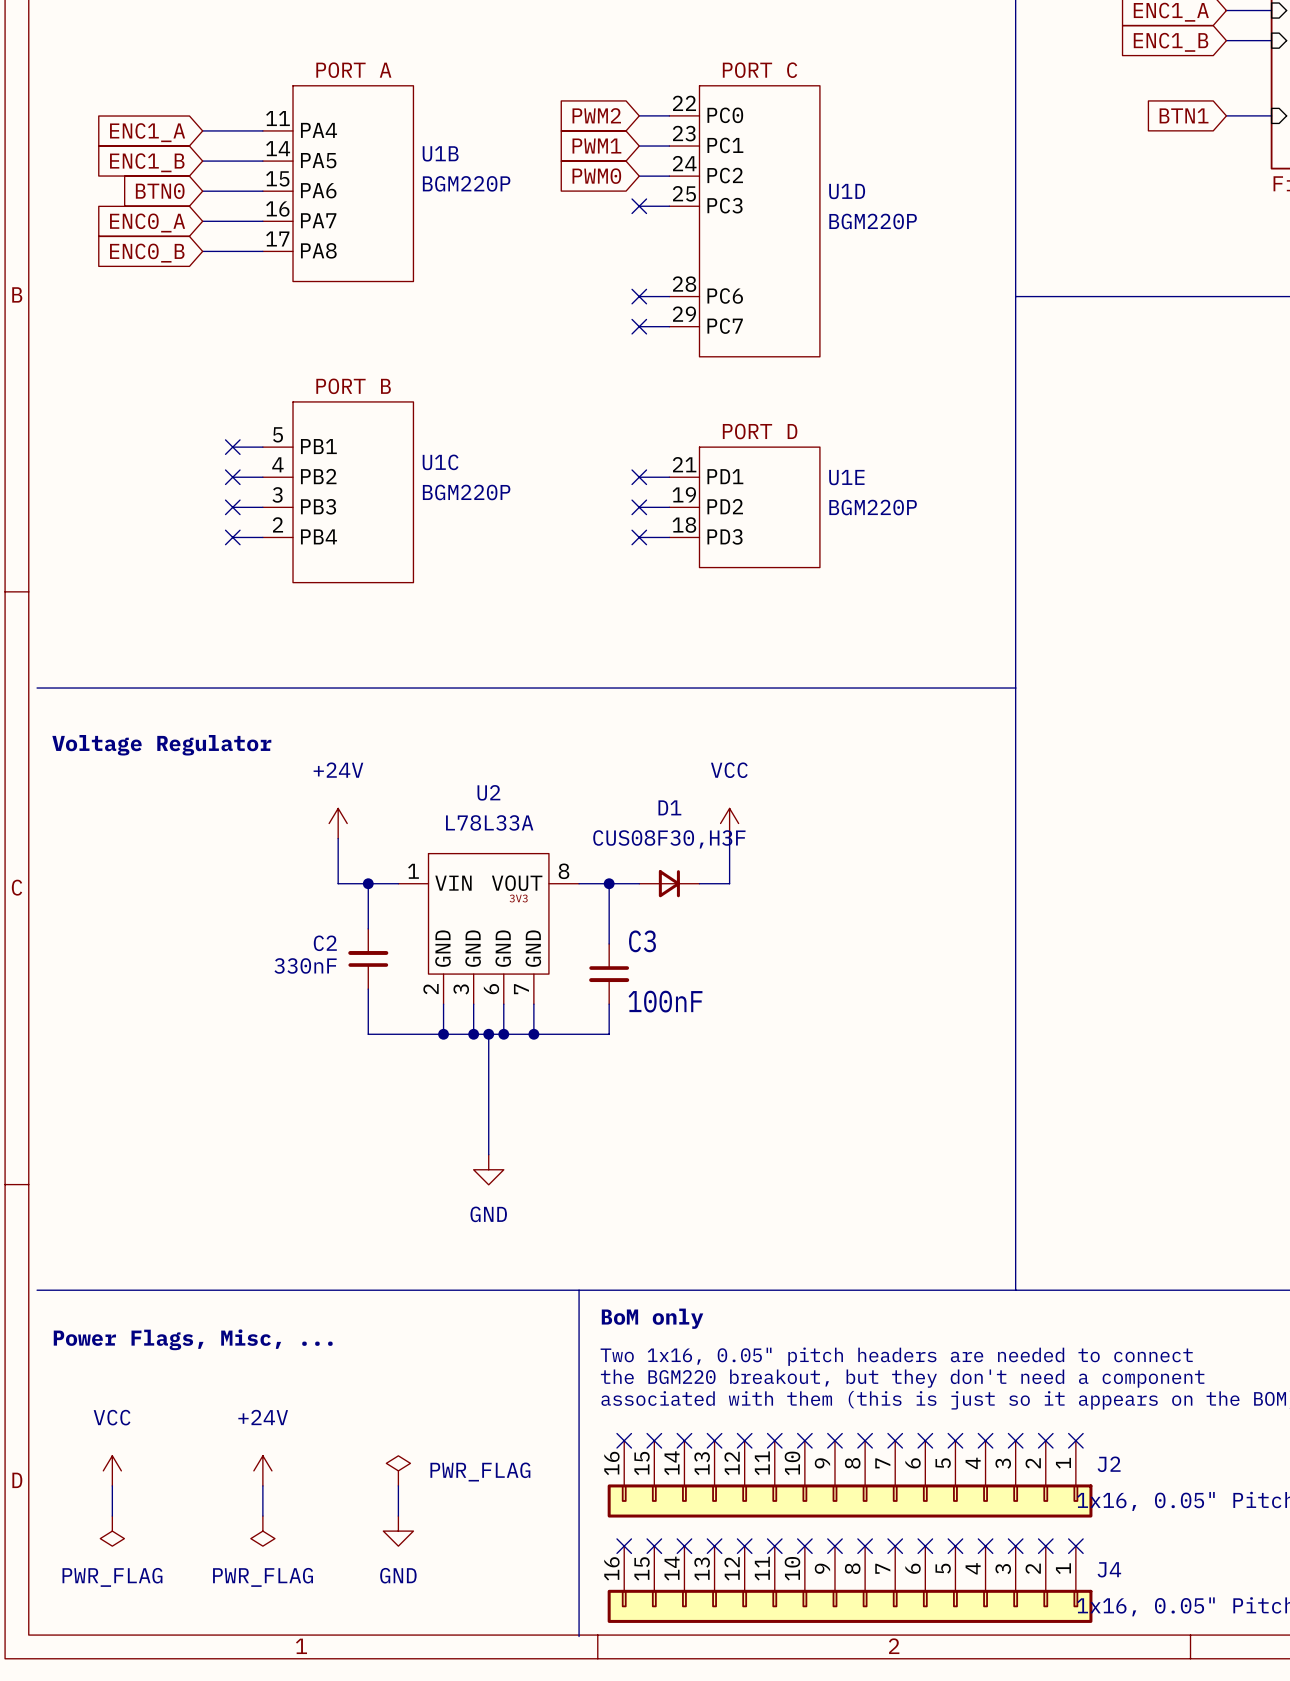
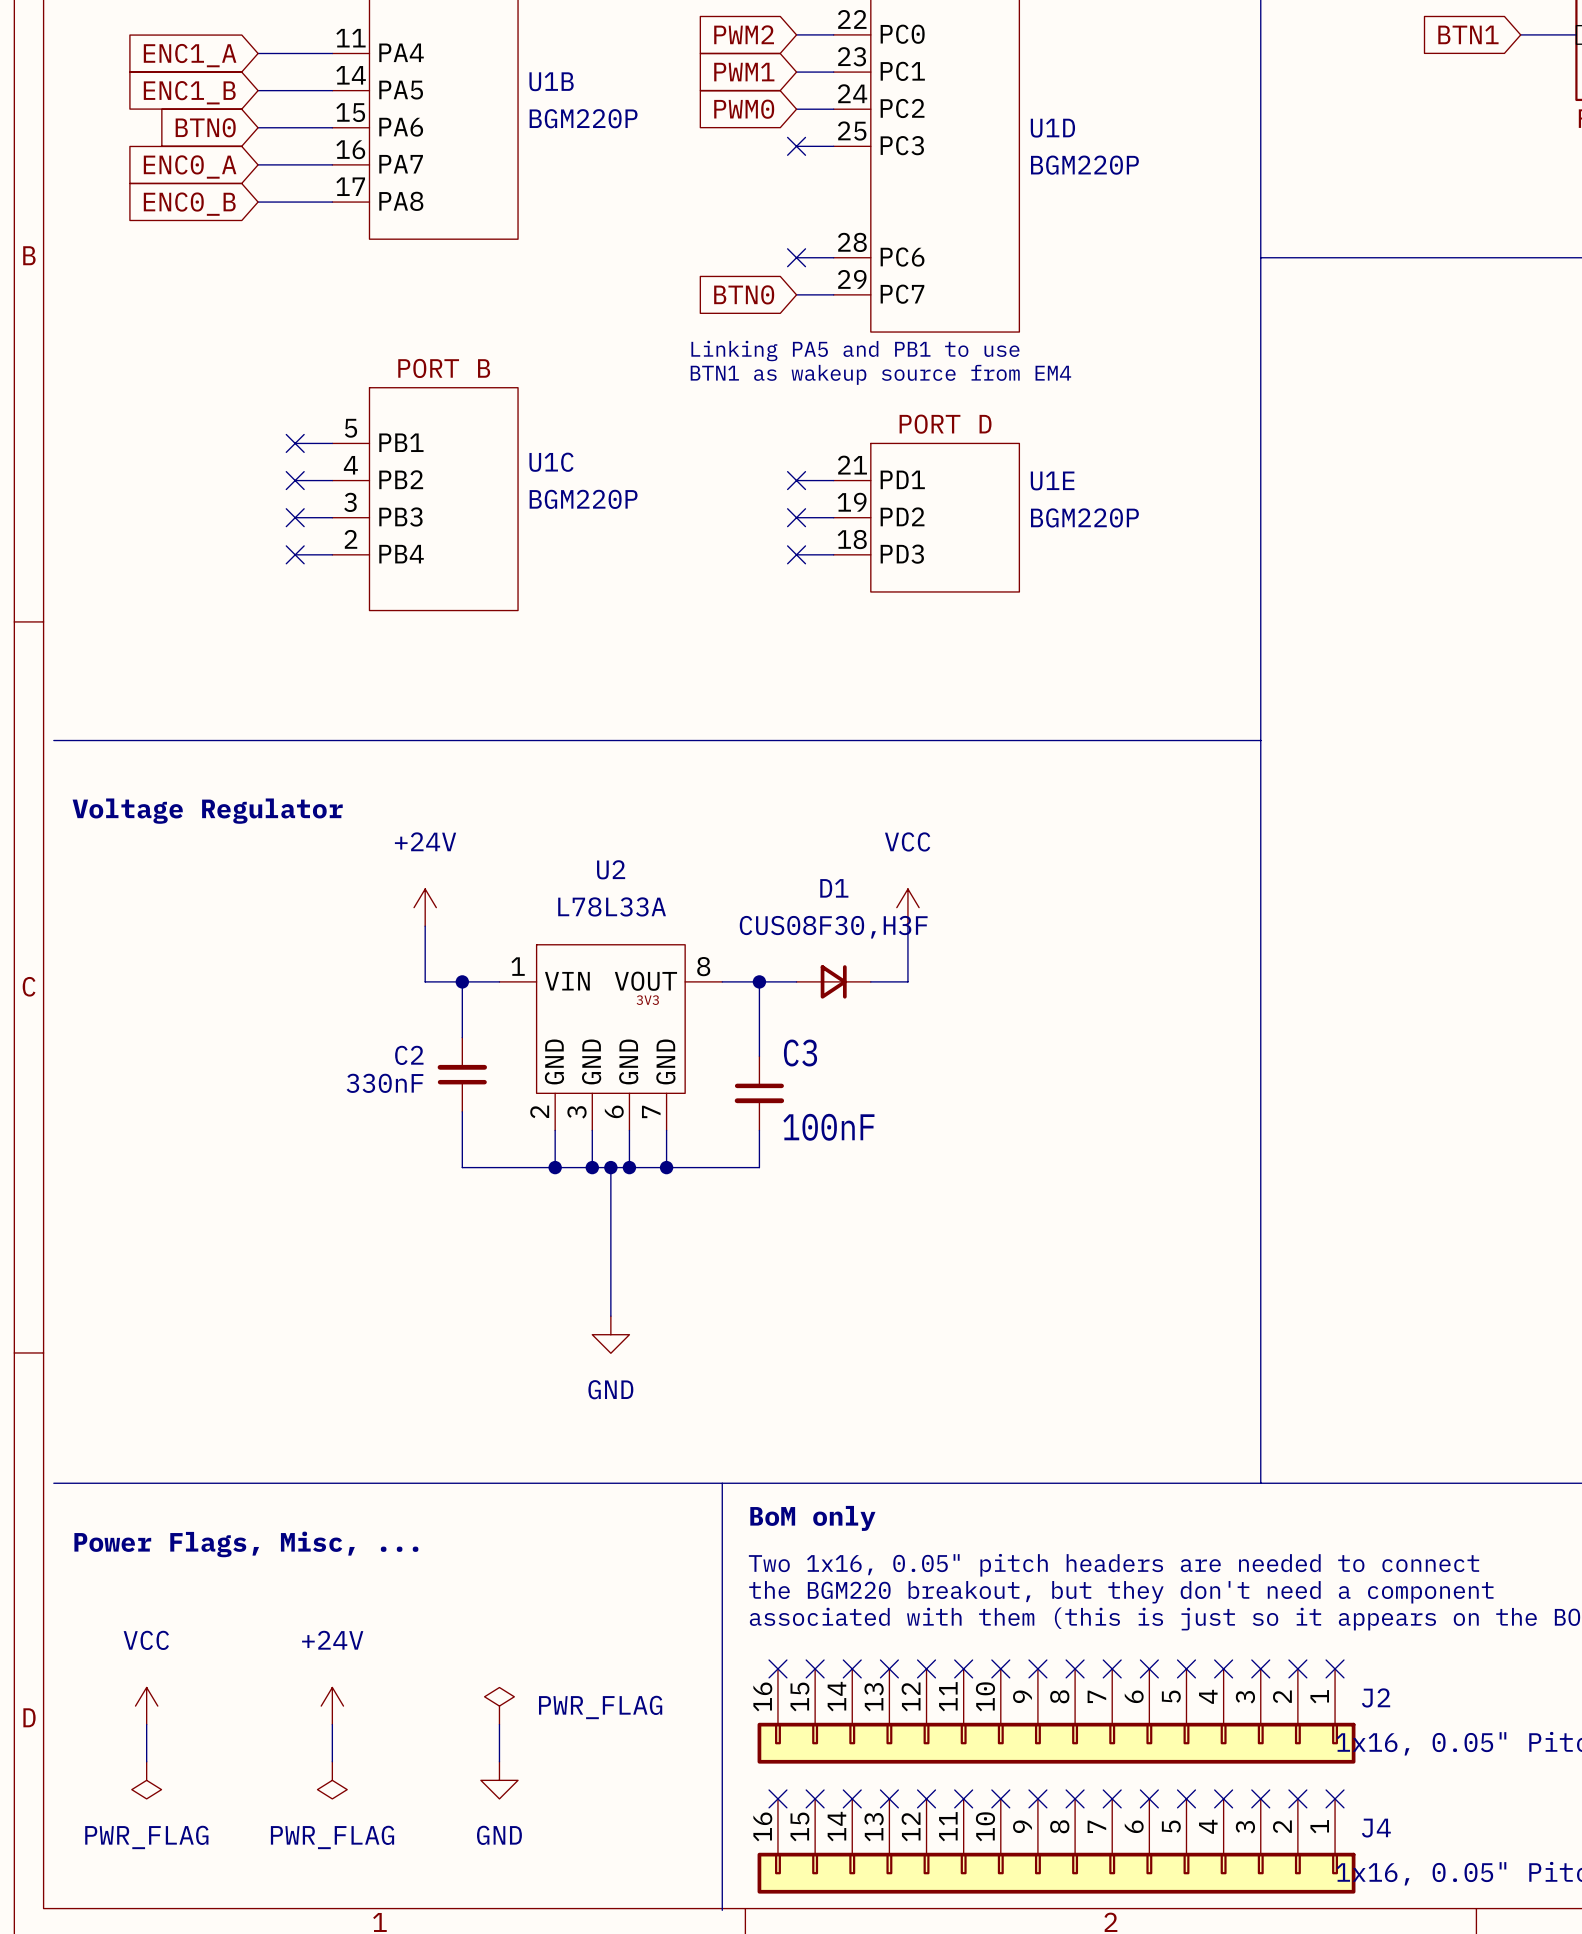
global label: none -> BTN0 (744, 294)
no-connect mark: (639, 326) -> none
text: none -> Linking PA5 and PB1 to use (855, 351)
text: none -> BTN1 as wakeup source from EM4 (880, 374)

